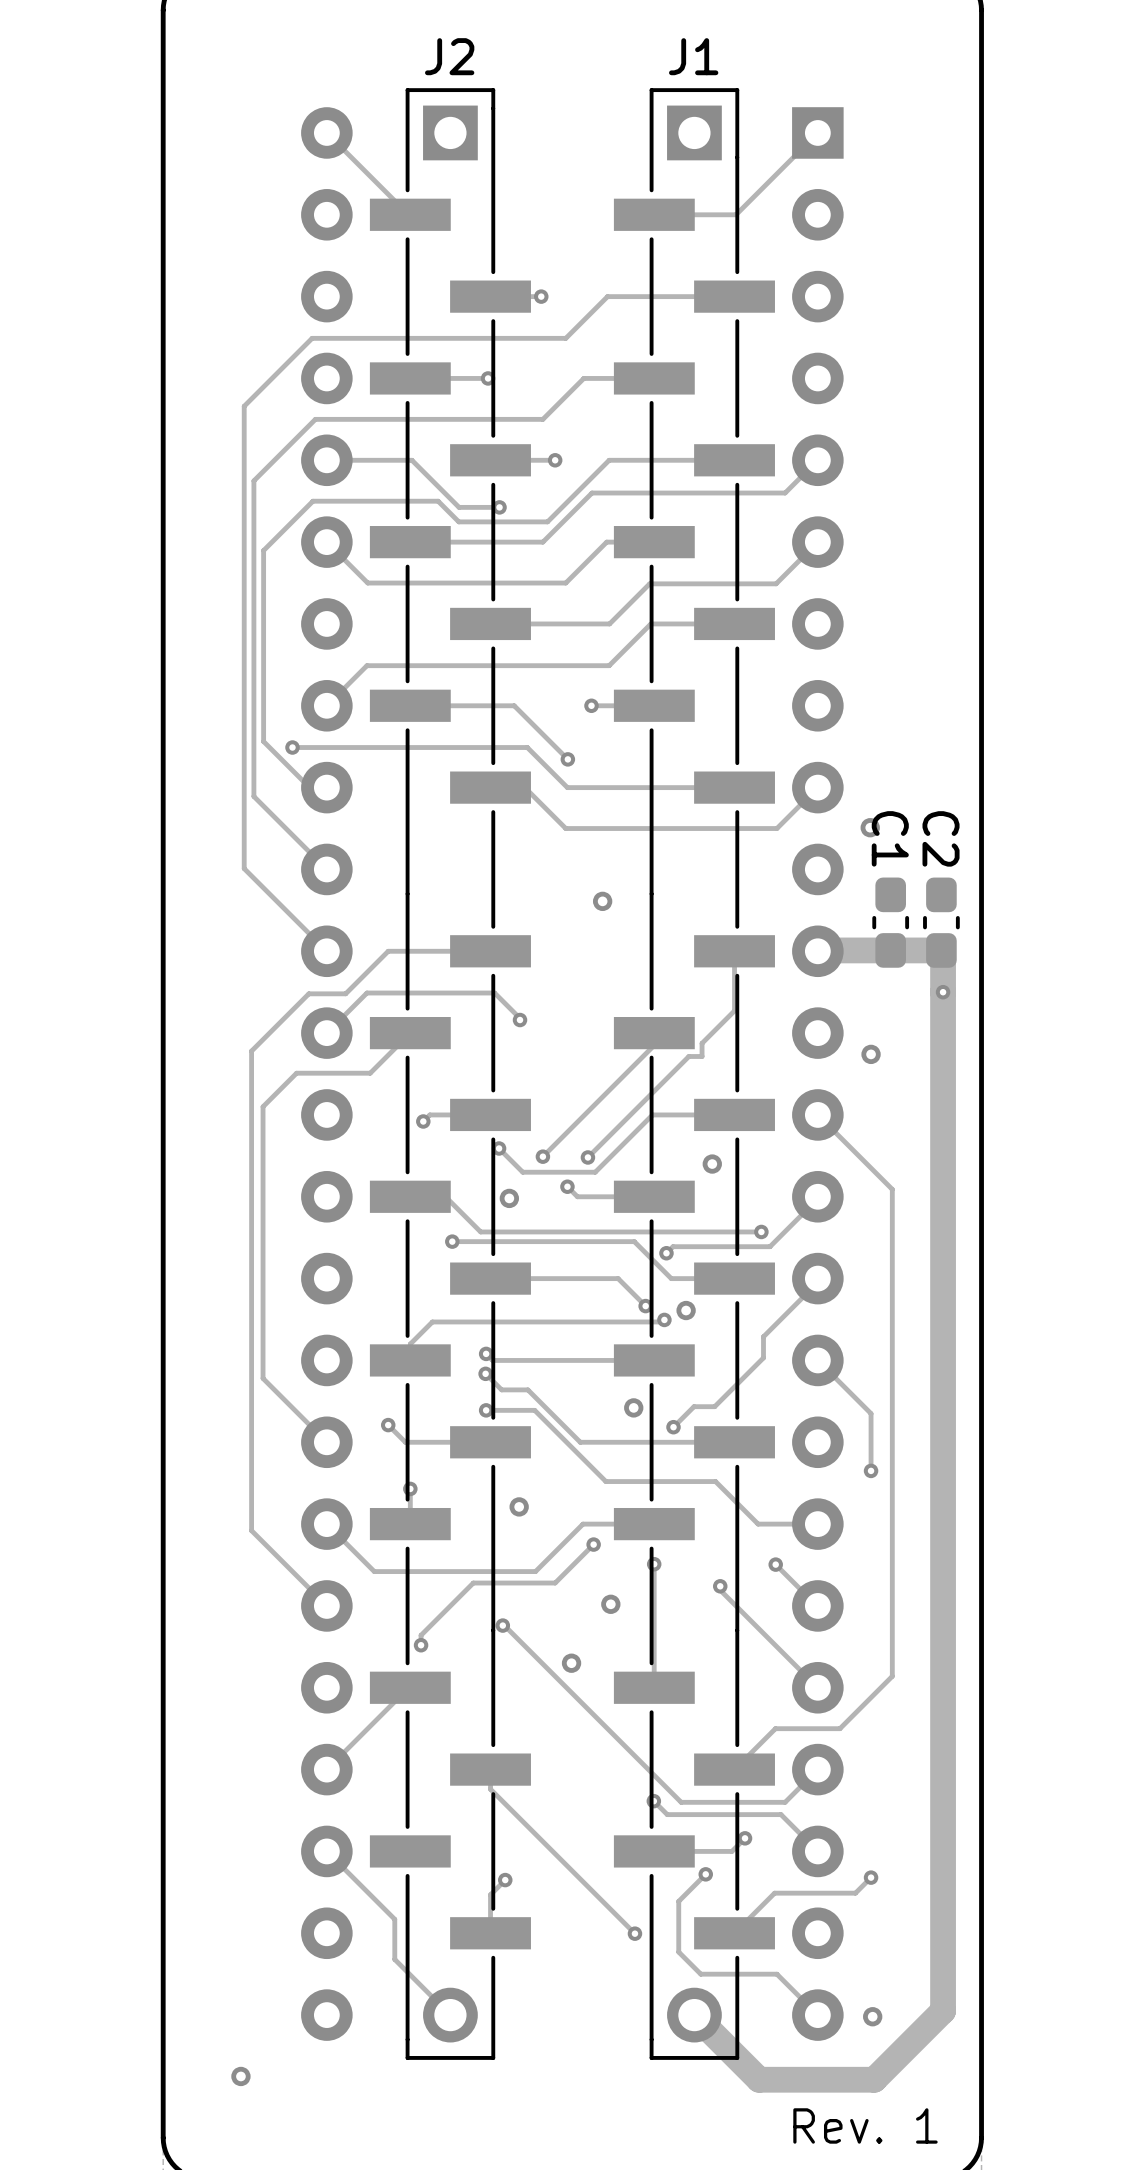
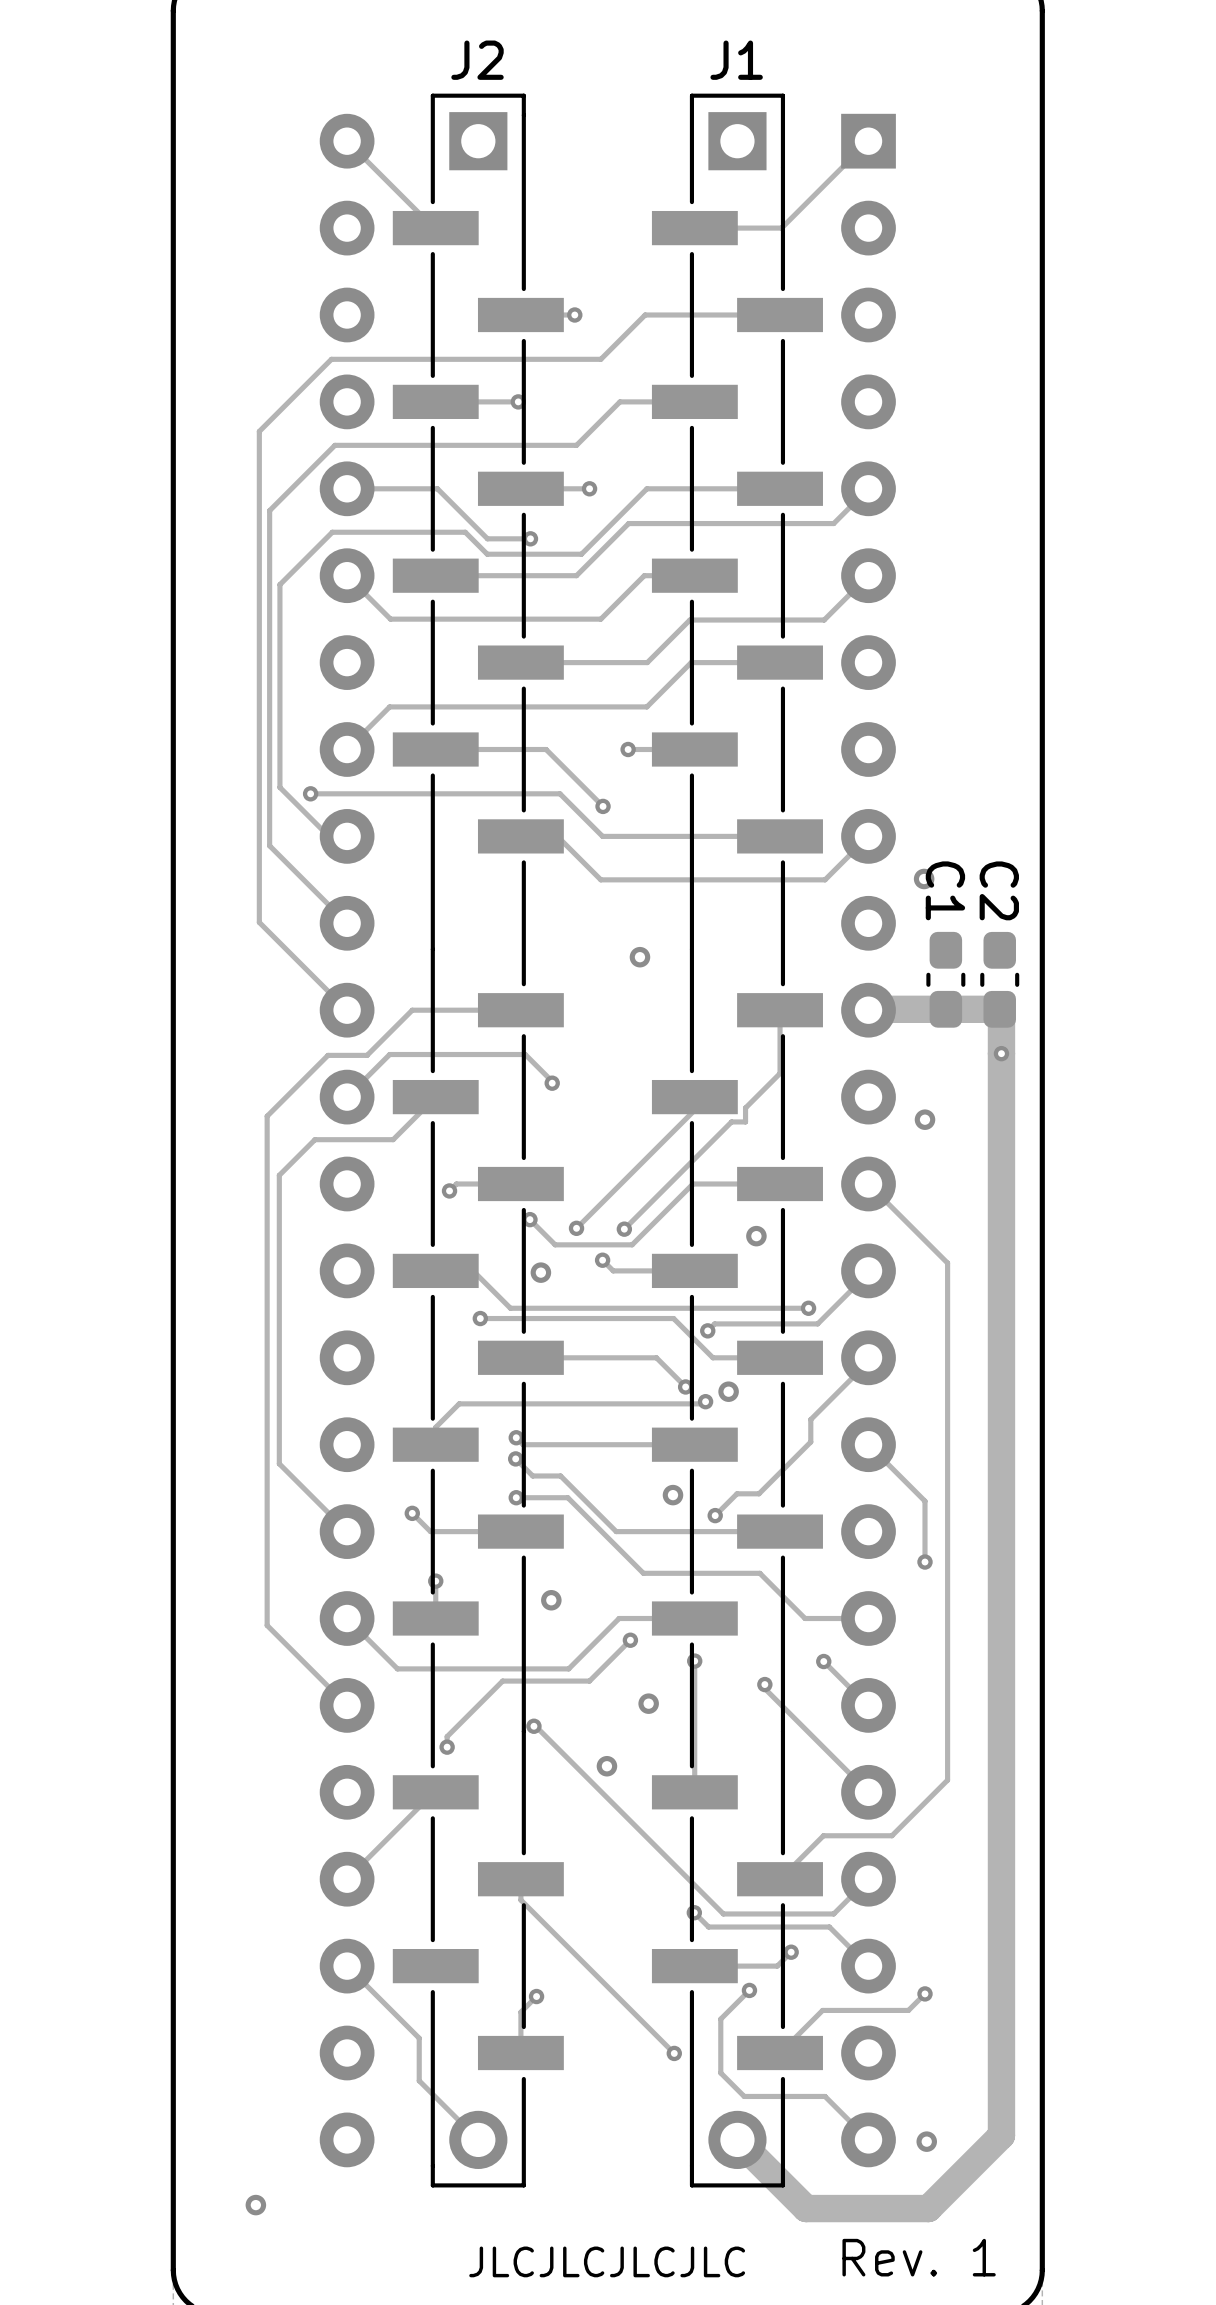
text: none -> JLCJLCJLCJLC (607, 2261)

